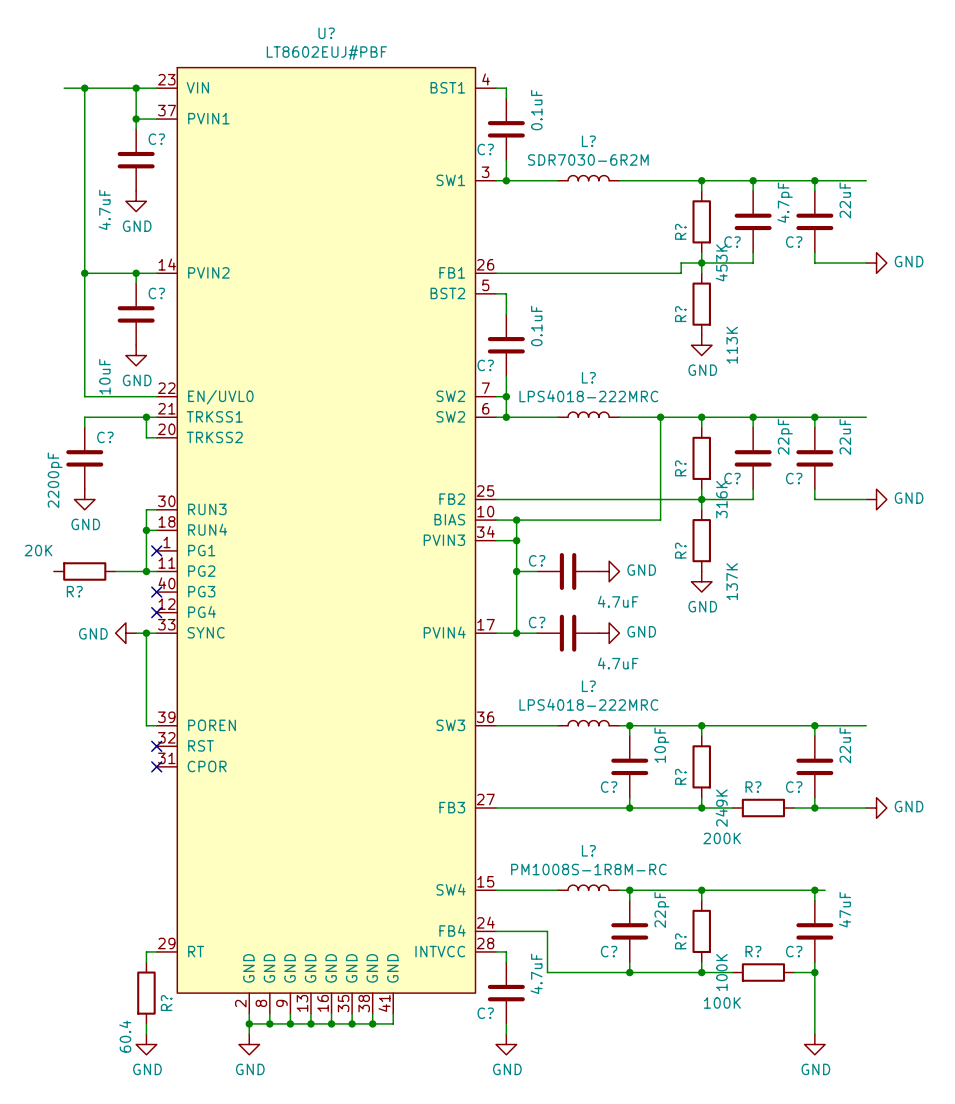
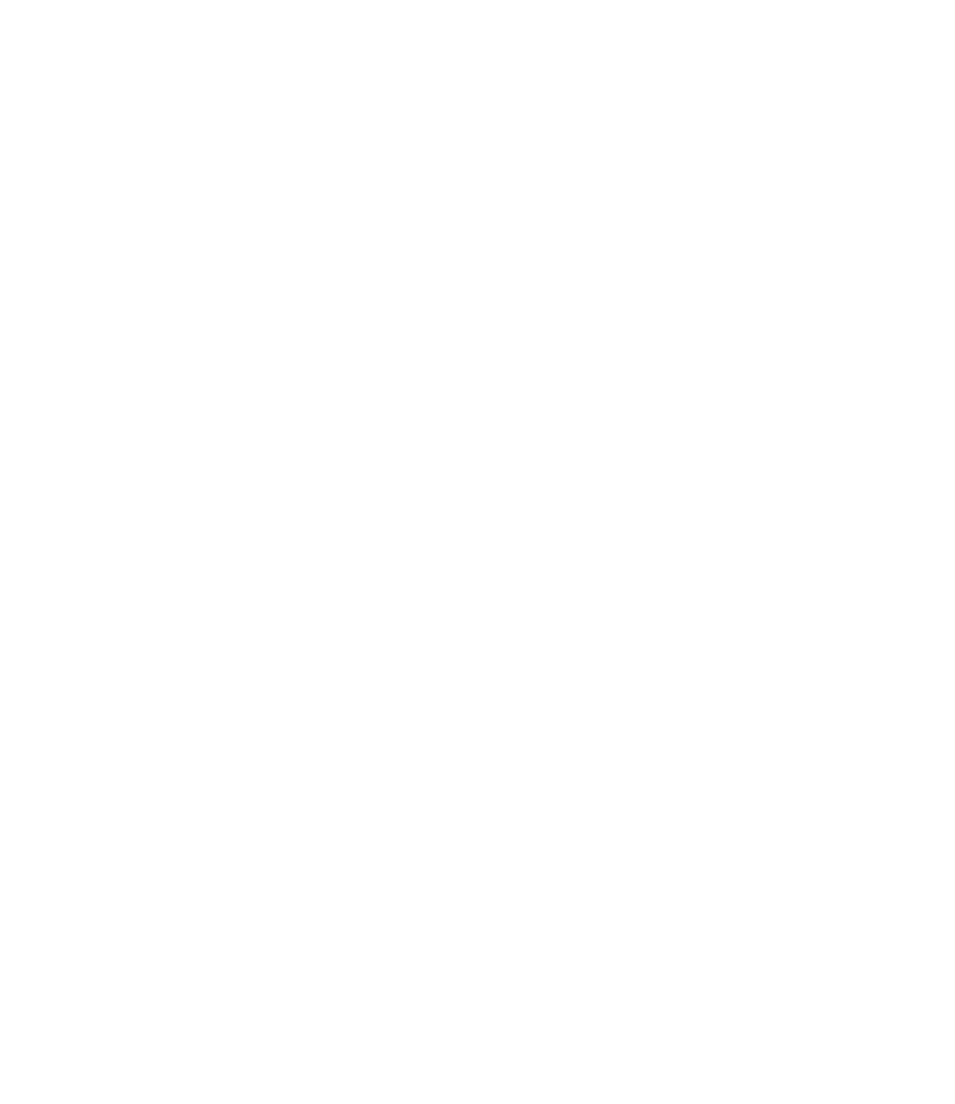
wire: (64, 88) (156, 88) -> none
wire: (84, 88) (84, 396) (156, 396) -> none
junction: (84, 88) -> none
wire: (136, 88) (136, 129) -> none
junction: (136, 88) -> none
wire: (496, 88) (506, 88) (506, 98) -> none
wire: (136, 119) (156, 119) -> none
junction: (136, 119) -> none
C?: 0.1uF (506, 129) -> none
C?: 4.7uF (136, 160) -> none
wire: (506, 160) (506, 180) -> none
L?: SDR7030-6R2M (588, 178) -> none
wire: (496, 180) (557, 180) -> none
junction: (506, 180) -> none
wire: (619, 180) (866, 180) -> none
wire: (701, 180) (701, 191) -> none
junction: (701, 180) -> none
wire: (753, 180) (753, 191) -> none
junction: (753, 180) -> none
wire: (814, 180) (814, 191) -> none
junction: (814, 180) -> none
power symbol: GND (136, 201) -> none
R?: 453K (701, 221) -> none
C?: 4.7pF (753, 221) -> none
C?: 22uF (814, 221) -> none
wire: (701, 252) (701, 273) -> none
wire: (753, 252) (753, 263) (681, 263) (681, 273) (496, 273) -> none
wire: (814, 252) (814, 263) (866, 263) -> none
junction: (701, 263) -> none
power symbol: GND (876, 263) -> none
wire: (84, 273) (156, 273) -> none
junction: (84, 273) -> none
wire: (136, 273) (136, 283) -> none
junction: (136, 273) -> none
wire: (496, 293) (506, 293) (506, 314) -> none
R?: 113K (701, 304) -> none
C?: 10uF (136, 314) -> none
C?: 0.1uF (506, 345) -> none
power symbol: GND (701, 345) -> none
power symbol: GND (136, 355) -> none
wire: (506, 376) (506, 417) -> none
wire: (496, 396) (506, 396) -> none
junction: (506, 396) -> none
L?: LPS4018-222MRC (588, 414) -> none
wire: (146, 417) (146, 437) (156, 437) -> none
junction: (146, 417) -> none
wire: (156, 417) (84, 417) (84, 427) -> none
wire: (496, 417) (557, 417) -> none
junction: (506, 417) -> none
wire: (619, 417) (866, 417) -> none
wire: (660, 417) (660, 520) (496, 520) -> none
junction: (660, 417) -> none
wire: (701, 417) (701, 427) -> none
junction: (701, 417) -> none
wire: (753, 417) (753, 427) -> none
junction: (753, 417) -> none
wire: (814, 417) (814, 427) -> none
junction: (814, 417) -> none
C?: 2200pF (84, 458) -> none
R?: 316K (701, 458) -> none
C?: 22pF (753, 458) -> none
C?: 22uF (814, 458) -> none
wire: (701, 489) (701, 509) -> none
wire: (753, 489) (753, 499) (496, 499) -> none
wire: (814, 489) (814, 499) (866, 499) -> none
power symbol: GND (84, 499) -> none
junction: (701, 499) -> none
power symbol: GND (876, 499) -> none
wire: (156, 509) (146, 509) (146, 571) -> none
wire: (516, 520) (516, 633) -> none
junction: (516, 520) -> none
wire: (146, 530) (156, 530) -> none
junction: (146, 530) -> none
U?: LT8602EUJ#PBF (326, 540) -> none
wire: (496, 540) (516, 540) -> none
junction: (516, 540) -> none
R?: 137K (701, 540) -> none
no-connect mark: (156, 550) -> none
R?: 20K (84, 571) -> none
wire: (115, 571) (156, 571) -> none
junction: (146, 571) -> none
wire: (516, 571) (537, 571) -> none
junction: (516, 571) -> none
C?: 4.7uF (568, 571) -> none
power symbol: GND (609, 571) -> none
power symbol: GND (701, 581) -> none
no-connect mark: (156, 592) -> none
no-connect mark: (156, 612) -> none
power symbol: GND (125, 633) -> none
wire: (136, 633) (156, 633) -> none
wire: (146, 633) (146, 725) (156, 725) -> none
junction: (146, 633) -> none
wire: (496, 633) (537, 633) -> none
junction: (516, 633) -> none
C?: 4.7uF (568, 633) -> none
power symbol: GND (609, 633) -> none
L?: LPS4018-222MRC (588, 723) -> none
wire: (496, 725) (557, 725) -> none
wire: (619, 725) (866, 725) -> none
wire: (629, 725) (629, 736) -> none
junction: (629, 725) -> none
wire: (701, 725) (701, 736) -> none
junction: (701, 725) -> none
wire: (814, 725) (814, 736) -> none
junction: (814, 725) -> none
no-connect mark: (156, 746) -> none
no-connect mark: (156, 766) -> none
C?: 10pF (629, 766) -> none
R?: 249K (701, 766) -> none
C?: 22uF (814, 766) -> none
wire: (629, 797) (629, 808) -> none
wire: (701, 797) (701, 808) -> none
wire: (814, 797) (814, 808) -> none
wire: (496, 808) (732, 808) -> none
junction: (629, 808) -> none
junction: (701, 808) -> none
R?: 200K (763, 808) -> none
wire: (794, 808) (866, 808) -> none
junction: (814, 808) -> none
power symbol: GND (876, 808) -> none
L?: PM1008S-1R8M-RC (588, 887) -> none
wire: (496, 890) (557, 890) -> none
wire: (619, 890) (825, 890) -> none
wire: (629, 890) (629, 900) -> none
junction: (629, 890) -> none
wire: (701, 890) (701, 900) -> none
junction: (701, 890) -> none
wire: (814, 890) (814, 900) -> none
junction: (814, 890) -> none
wire: (496, 931) (547, 931) (547, 972) (732, 972) -> none
C?: 22pF (629, 931) -> none
R?: 100K (701, 931) -> none
C?: 47uF (814, 931) -> none
wire: (156, 951) (146, 951) (146, 962) -> none
wire: (496, 951) (506, 951) (506, 962) -> none
wire: (629, 962) (629, 972) -> none
wire: (701, 962) (701, 972) -> none
wire: (814, 962) (814, 1034) -> none
junction: (629, 972) -> none
junction: (701, 972) -> none
R?: 100K (763, 972) -> none
wire: (794, 972) (814, 972) -> none
junction: (814, 972) -> none
R?: 60.4 (146, 993) -> none
C?: 4.7uF (506, 993) -> none
wire: (249, 1013) (249, 1034) -> none
wire: (269, 1013) (269, 1023) -> none
wire: (290, 1013) (290, 1023) -> none
wire: (310, 1013) (310, 1023) -> none
wire: (331, 1013) (331, 1023) -> none
wire: (352, 1013) (352, 1023) -> none
wire: (372, 1013) (372, 1023) -> none
wire: (393, 1013) (393, 1023) (249, 1023) -> none
wire: (146, 1023) (146, 1034) -> none
junction: (249, 1023) -> none
junction: (269, 1023) -> none
junction: (290, 1023) -> none
junction: (310, 1023) -> none
junction: (331, 1023) -> none
junction: (352, 1023) -> none
junction: (372, 1023) -> none
wire: (506, 1023) (506, 1034) -> none
power symbol: GND (146, 1044) -> none
power symbol: GND (249, 1044) -> none
power symbol: GND (506, 1044) -> none
power symbol: GND (814, 1044) -> none

